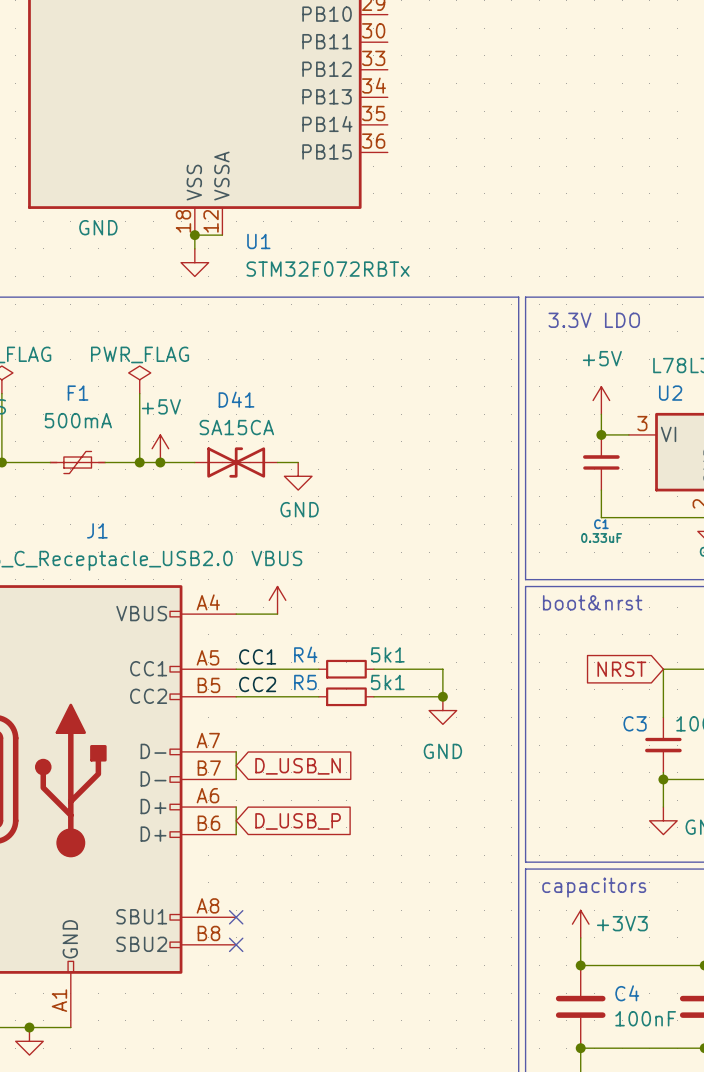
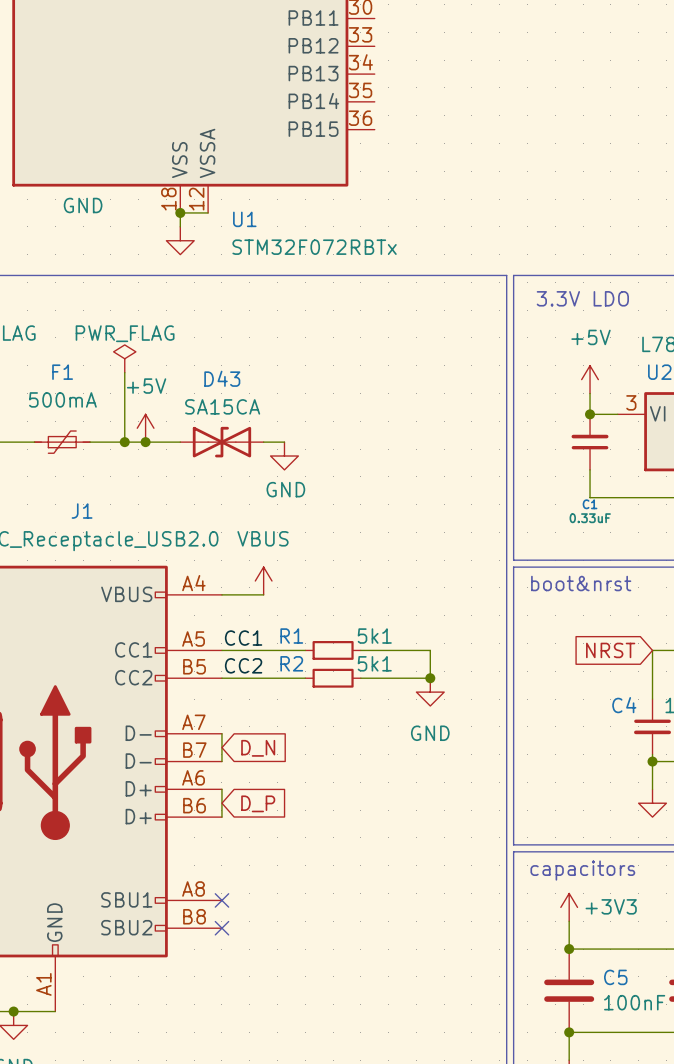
D41 name: D41 (236, 399) -> D43 (222, 378)
R4 name: R4 (305, 654) -> R1 (291, 636)
R5 name: R5 (305, 682) -> R2 (291, 663)
C3 name: C3 (635, 723) -> C4 (624, 705)
global label: D_USB_N (298, 766) -> D_N (258, 748)
global label: D_USB_P (298, 821) -> D_P (258, 803)
C4 name: C4 (627, 993) -> C5 (615, 977)

